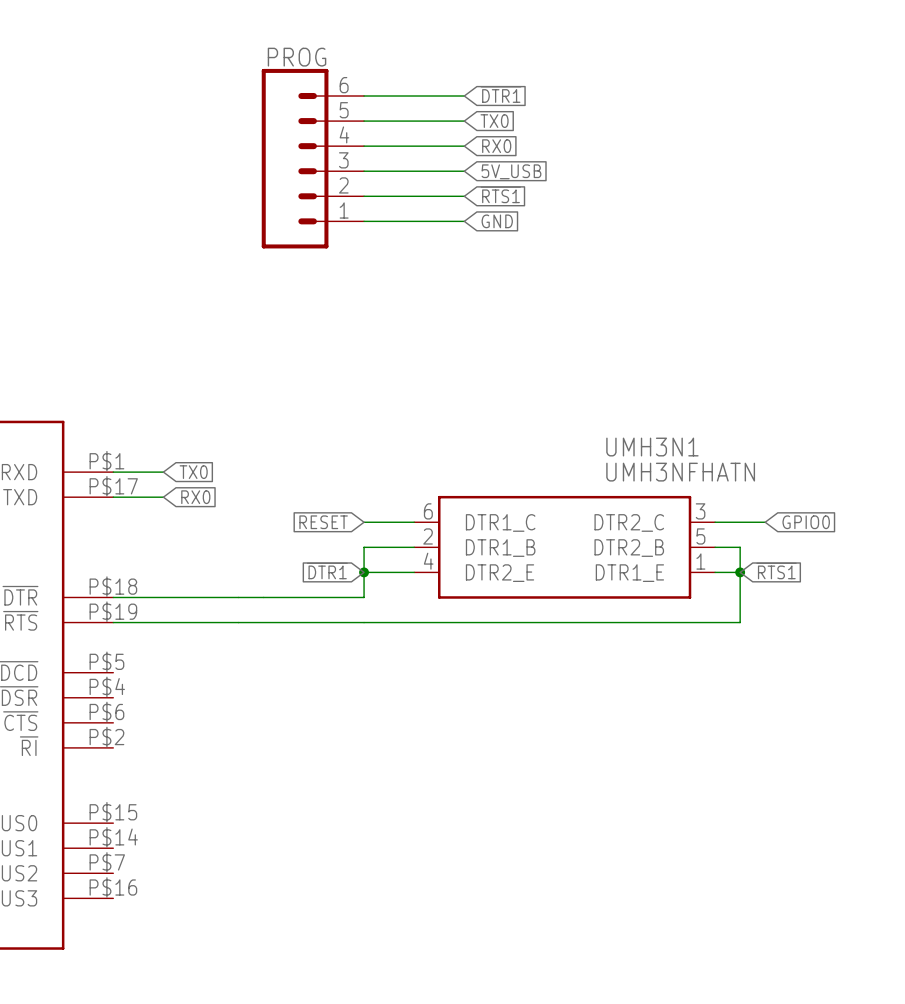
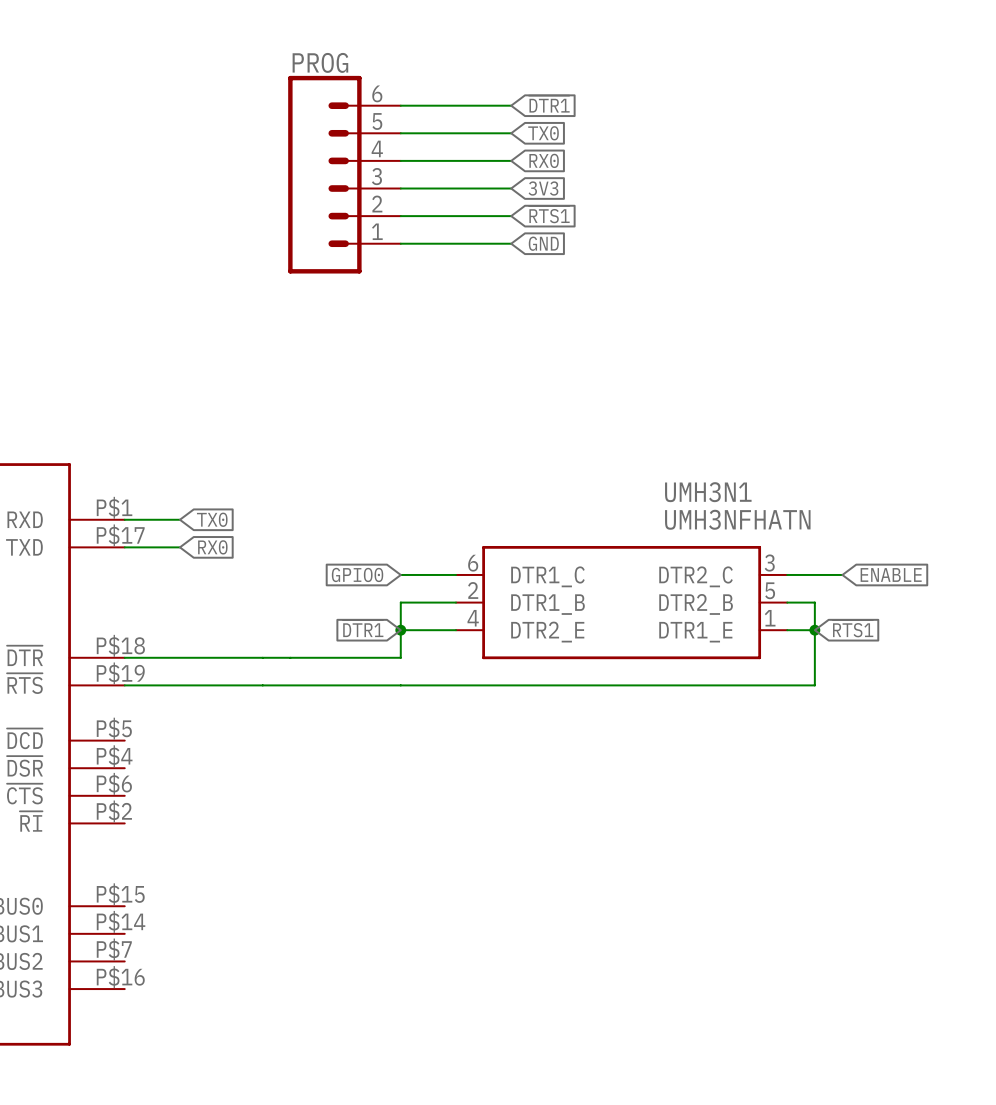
global label: 5V_USB (511, 171) -> 3V3 (543, 188)
global label: RESET (323, 522) -> GPIO0 (357, 574)
global label: GPIO0 (806, 522) -> ENABLE (891, 574)

